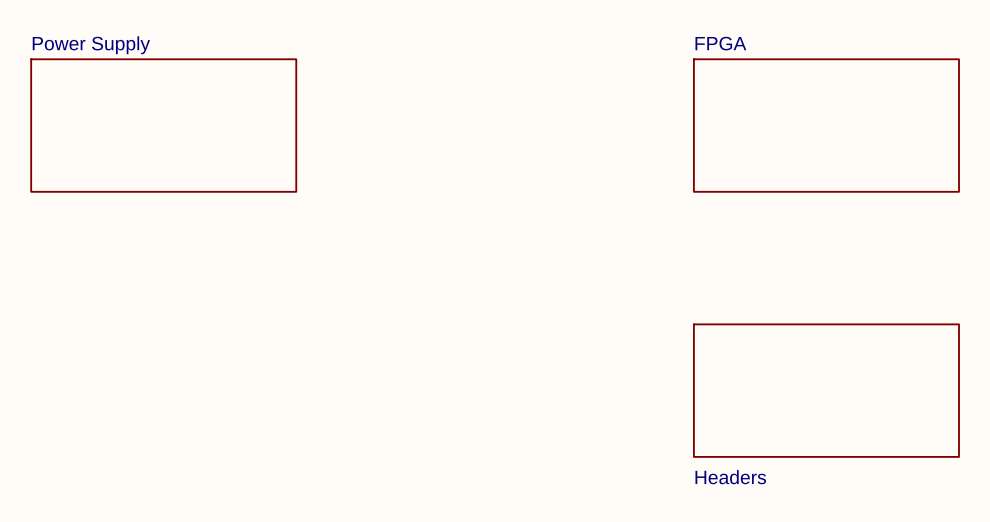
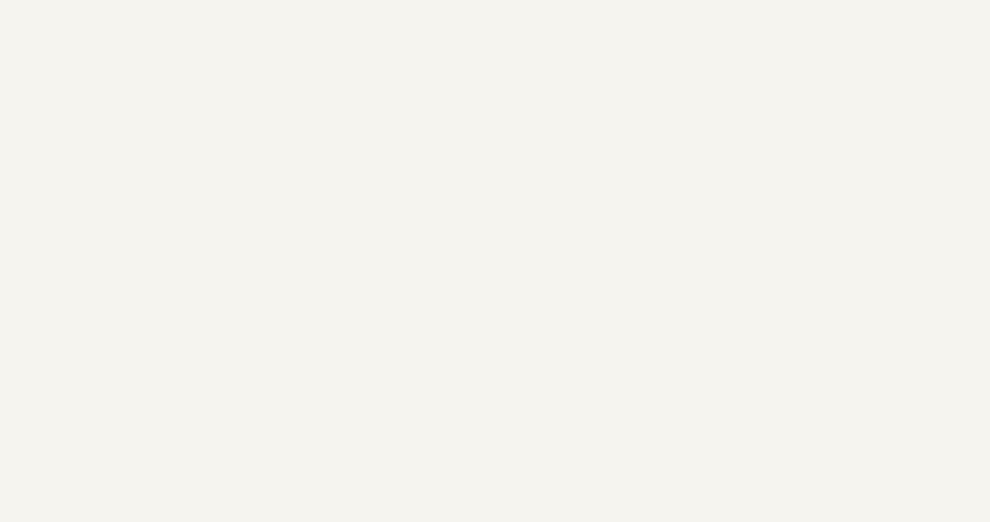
sheet Power Supply: (163, 125) -> none
sheet FPGA: (826, 125) -> none
sheet Headers: (826, 390) -> none

